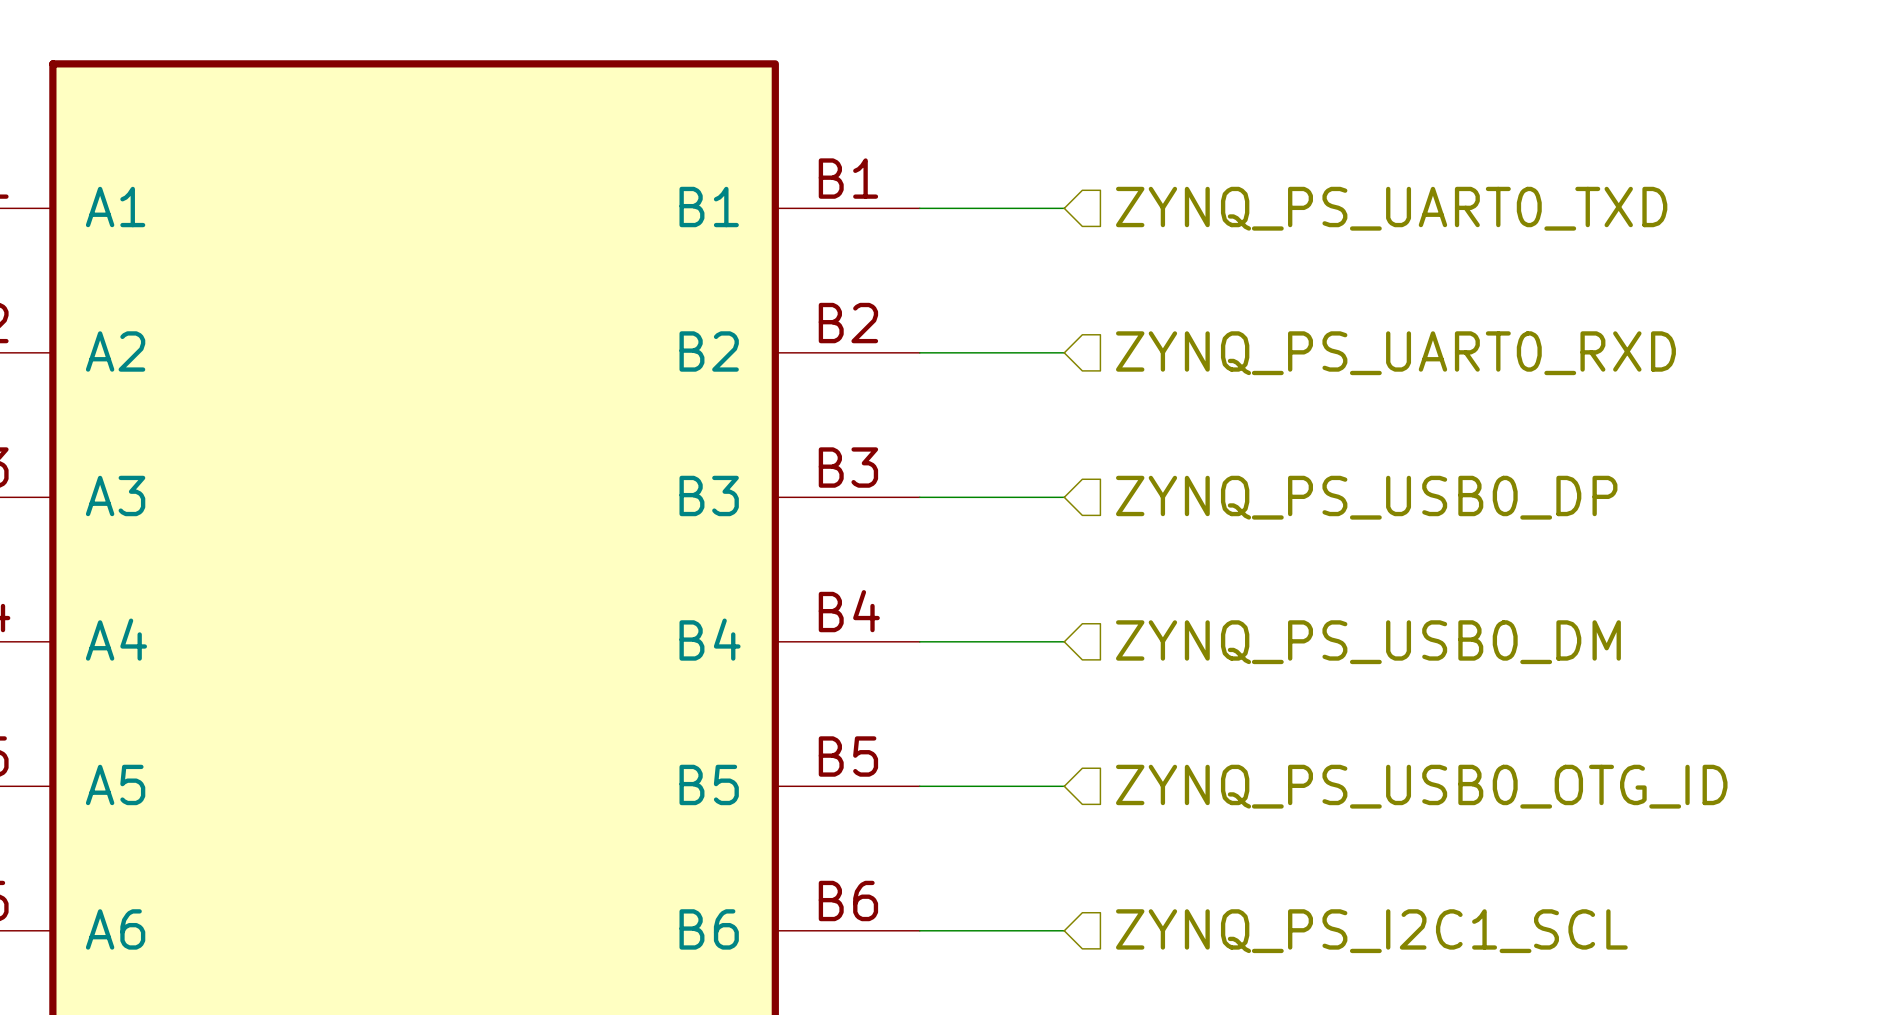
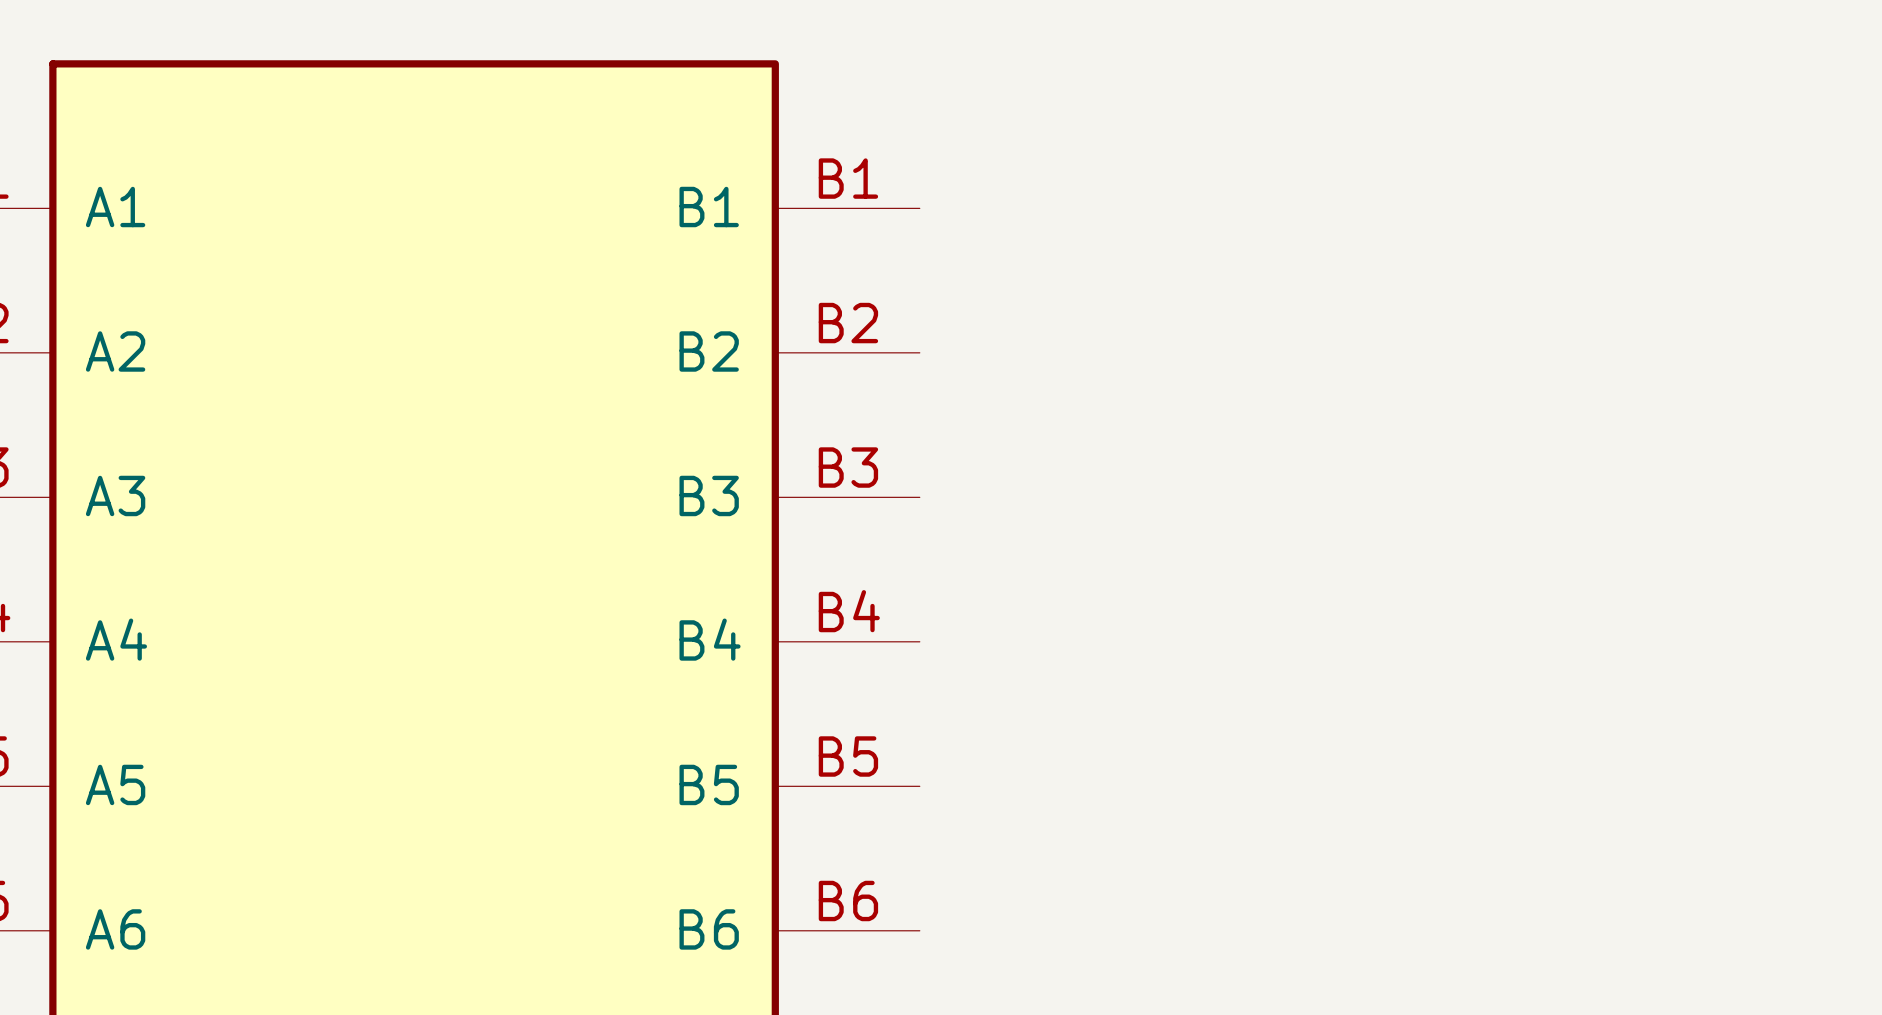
wire: (919, 208) (1064, 208) -> none
hierarchical label: ZYNQ_PS_UART0_TXD (1391, 208) -> none
wire: (919, 352) (1064, 352) -> none
hierarchical label: ZYNQ_PS_UART0_RXD (1395, 353) -> none
wire: (919, 497) (1064, 497) -> none
hierarchical label: ZYNQ_PS_USB0_DP (1366, 497) -> none
wire: (919, 641) (1064, 641) -> none
hierarchical label: ZYNQ_PS_USB0_DM (1368, 642) -> none
wire: (919, 786) (1064, 786) -> none
hierarchical label: ZYNQ_PS_USB0_OTG_ID (1421, 786) -> none
wire: (919, 930) (1064, 930) -> none
hierarchical label: ZYNQ_PS_I2C1_SCL (1371, 931) -> none

